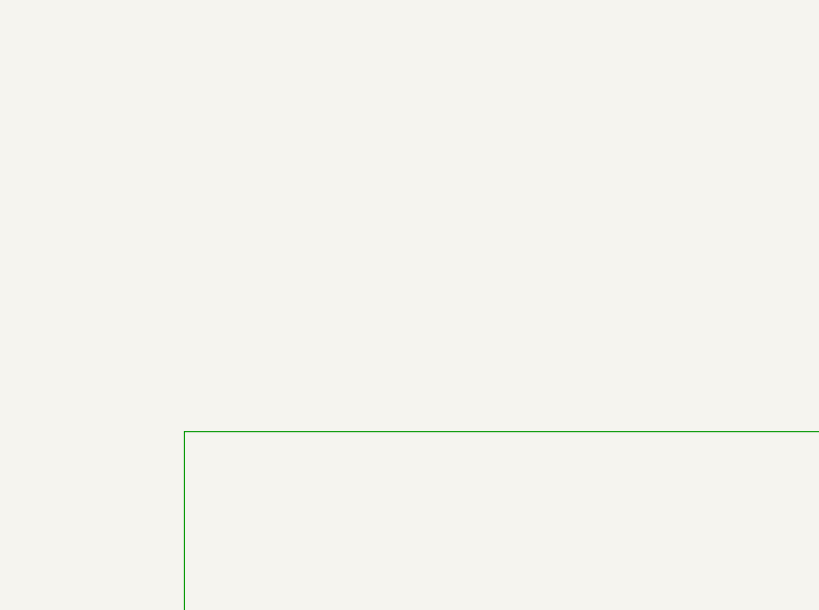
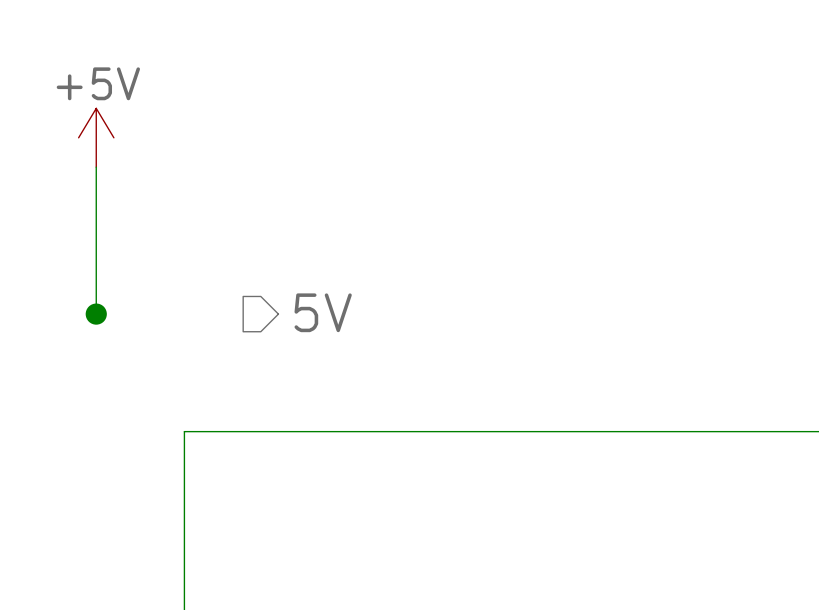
power symbol: none -> +5V (96, 137)
wire: none -> (96, 167) (96, 314)
sheet pin: none -> 5V (323, 312)
junction: none -> (96, 314)

